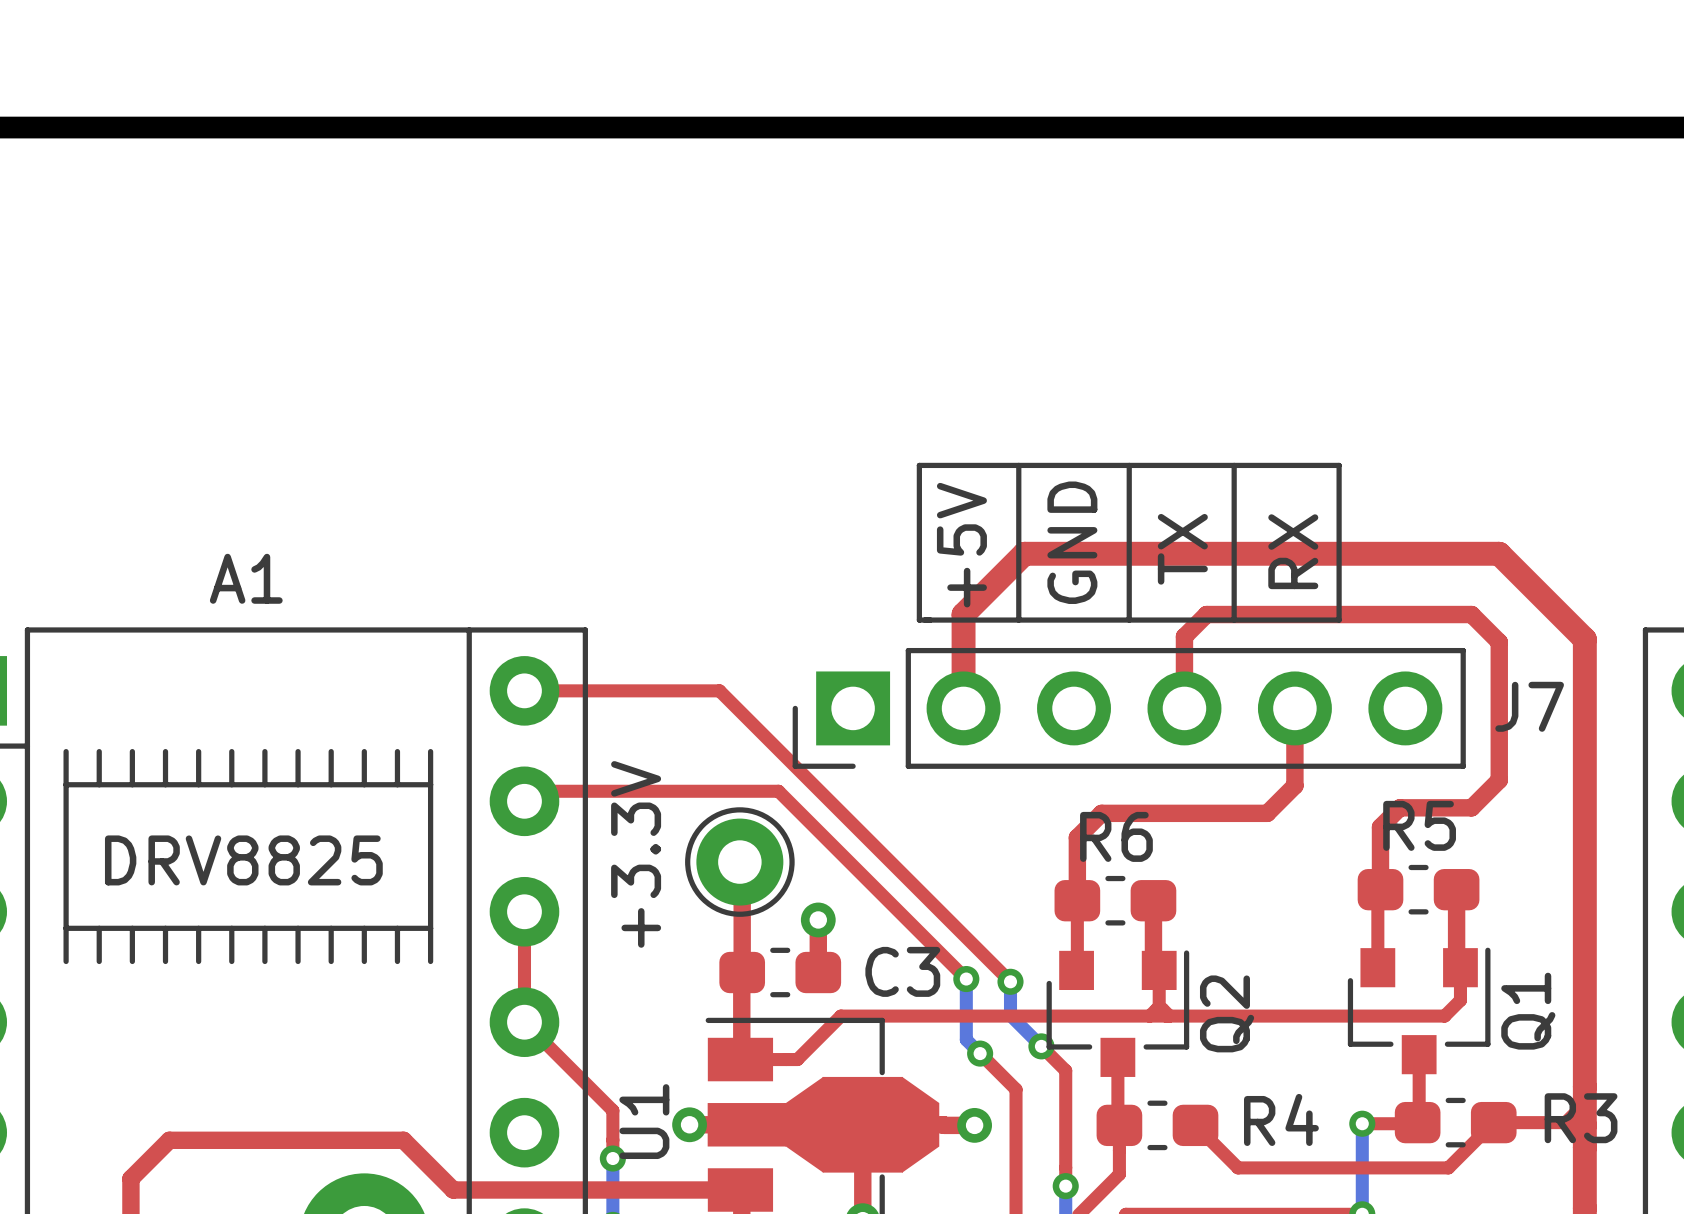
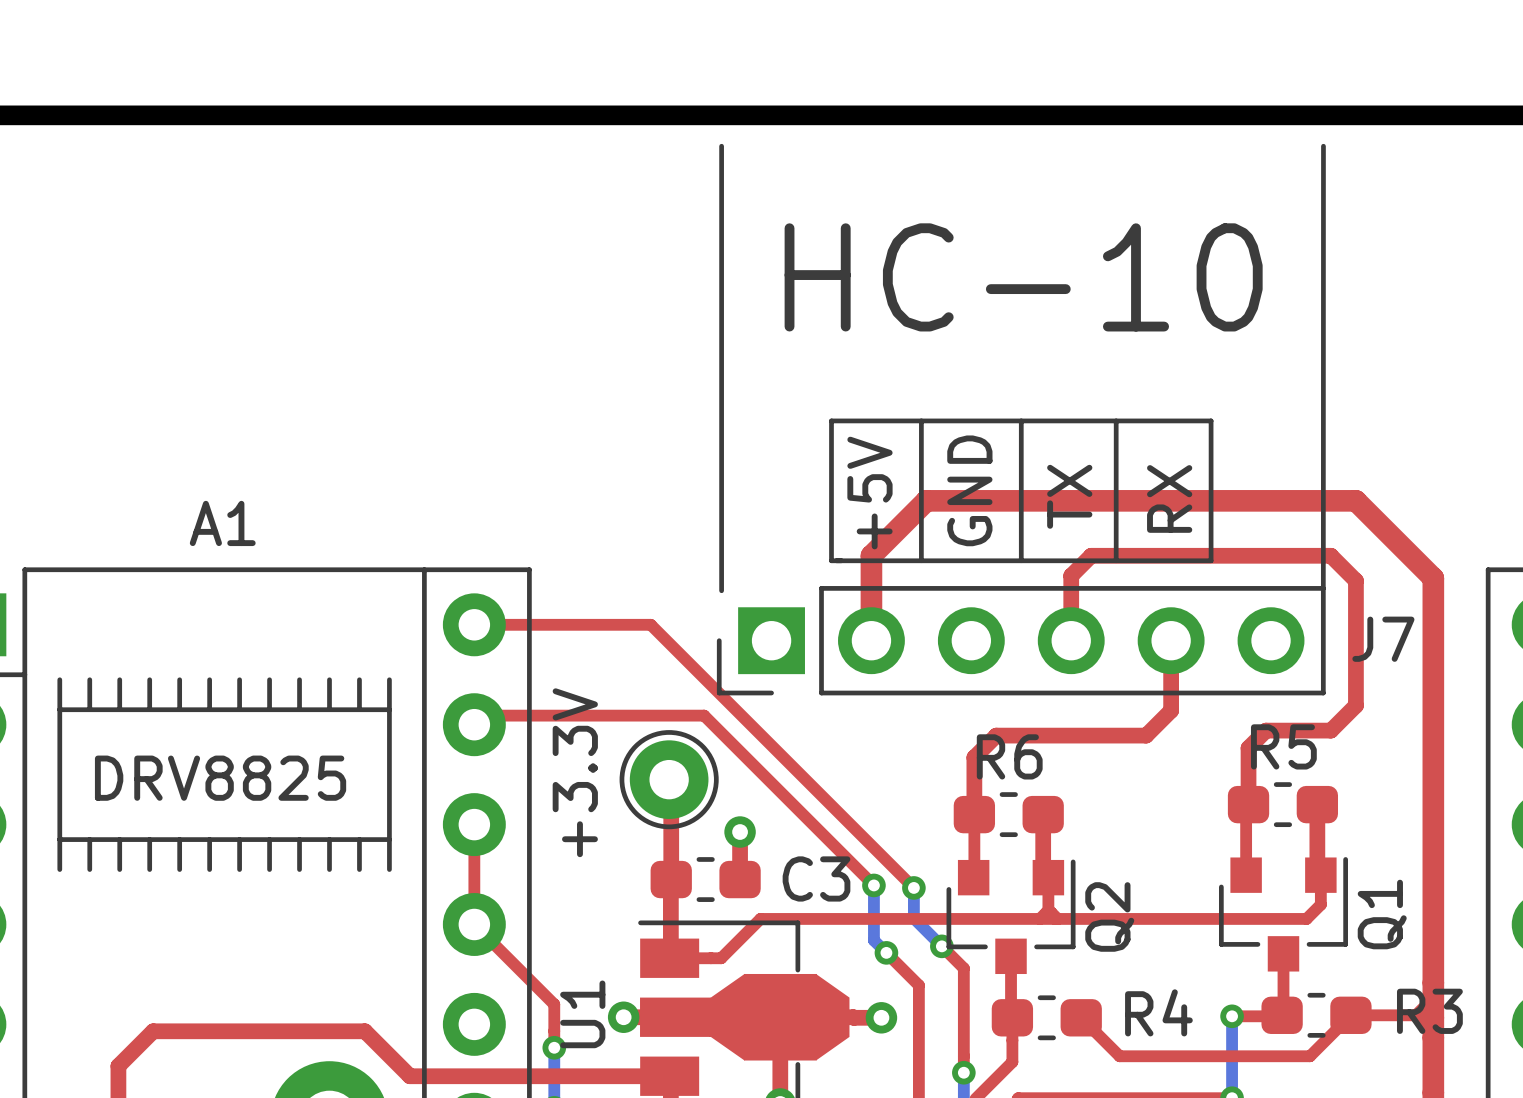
line: none -> (721, 146) (721, 590)
line: none -> (1323, 146) (1323, 588)
text: none -> HC-10 (1023, 277)

